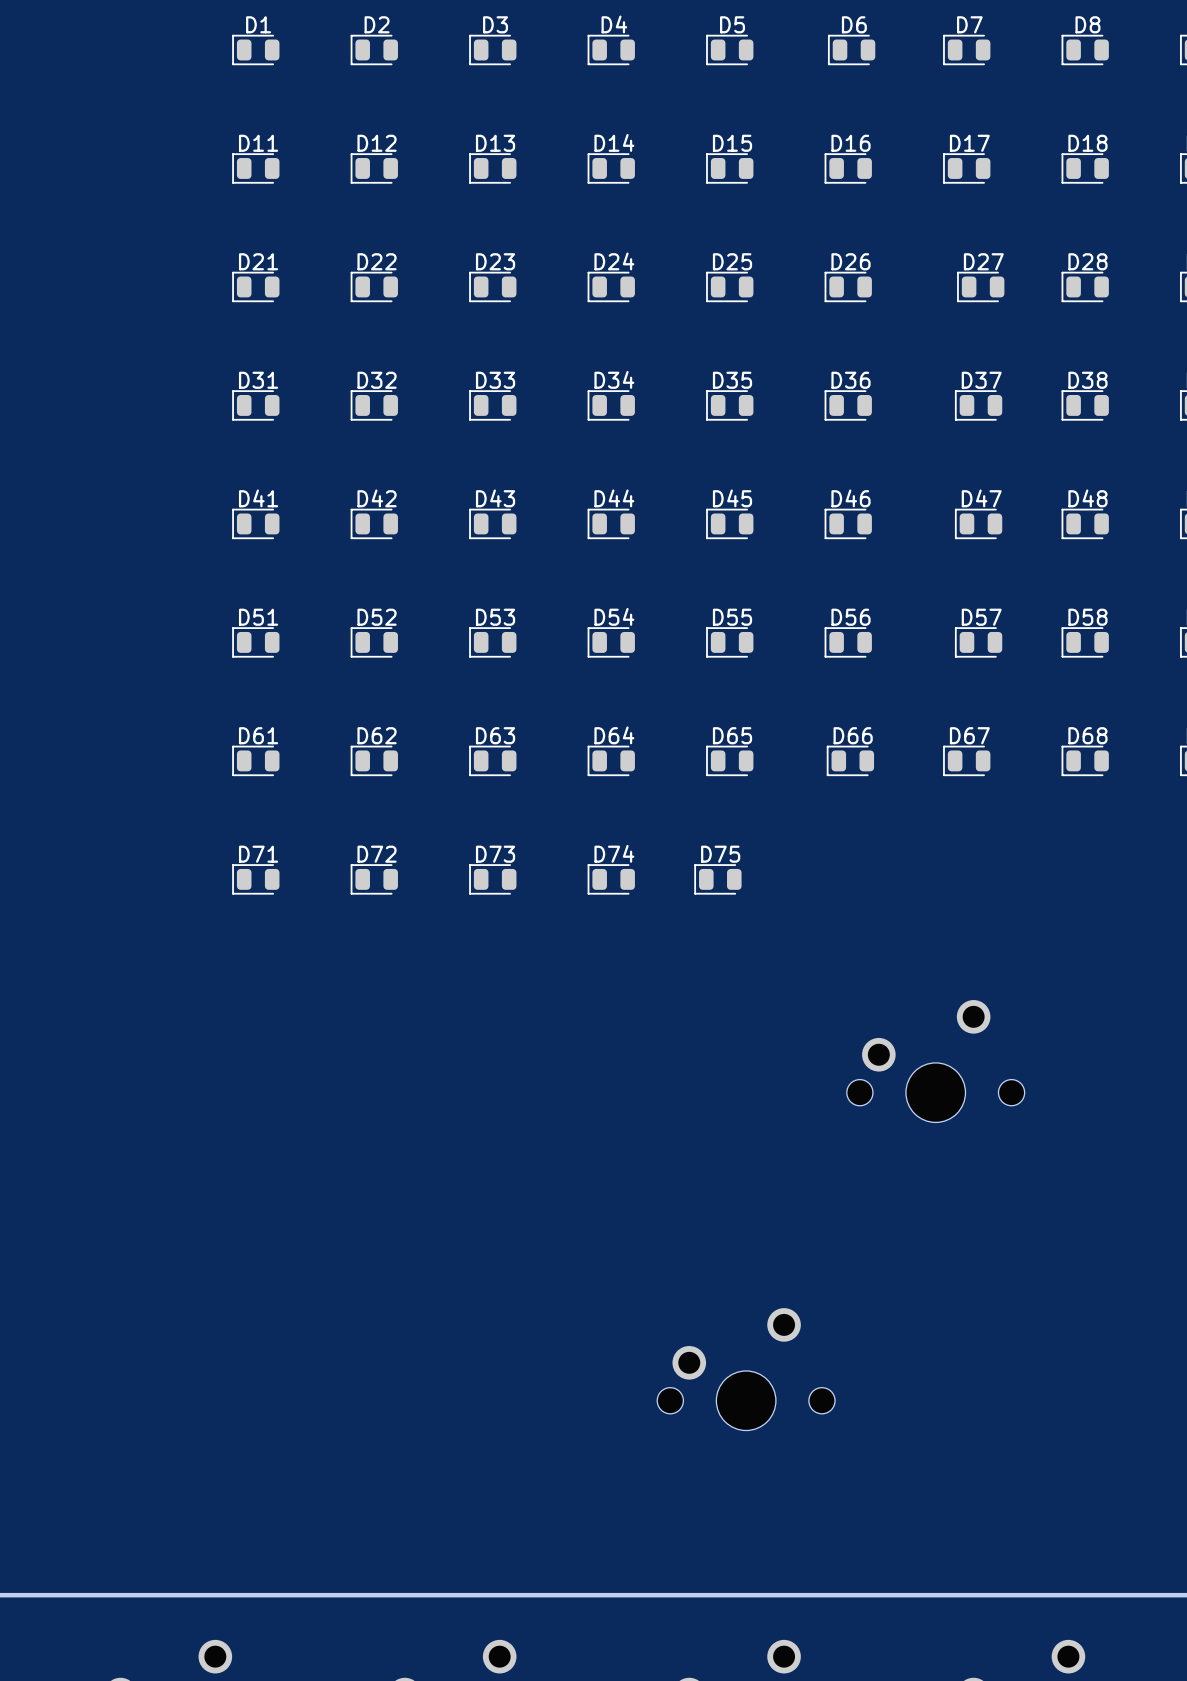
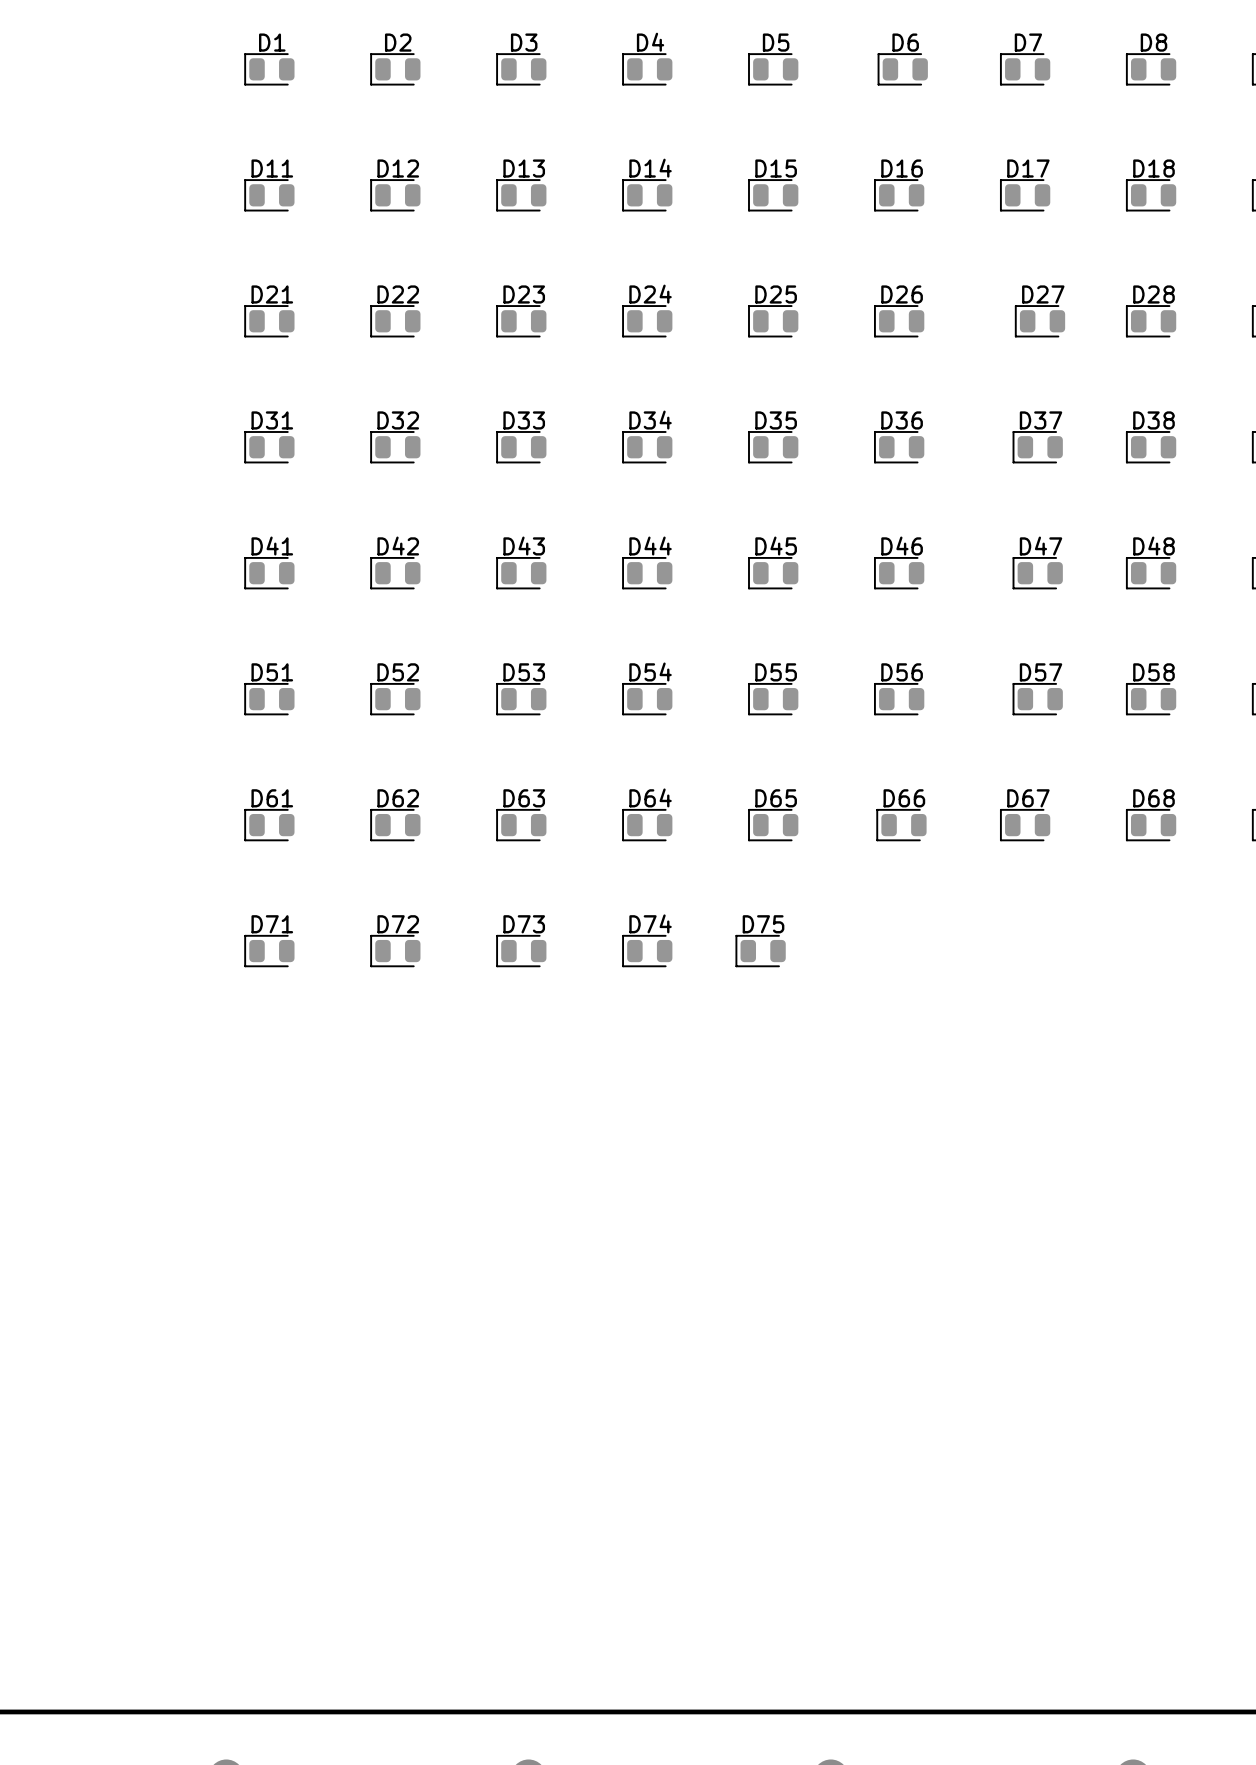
part: (935, 1061) -> none
part: (746, 1369) -> none

